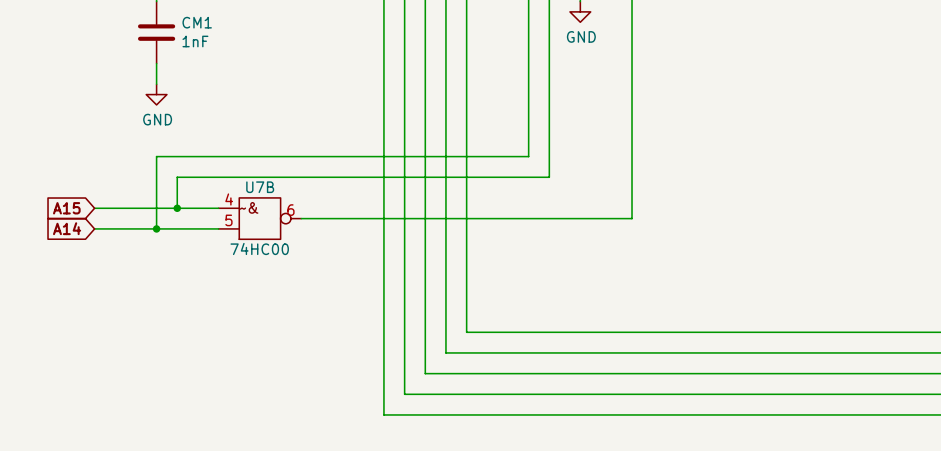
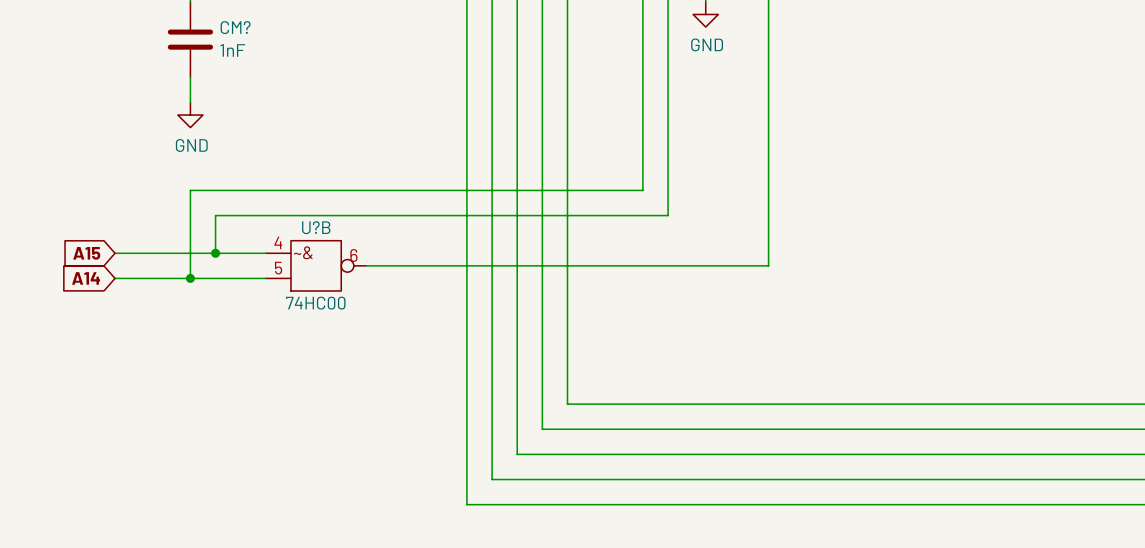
CM1 name: CM1 (197, 22) -> CM? (235, 27)
U7B name: U7B (260, 187) -> U?B (316, 227)

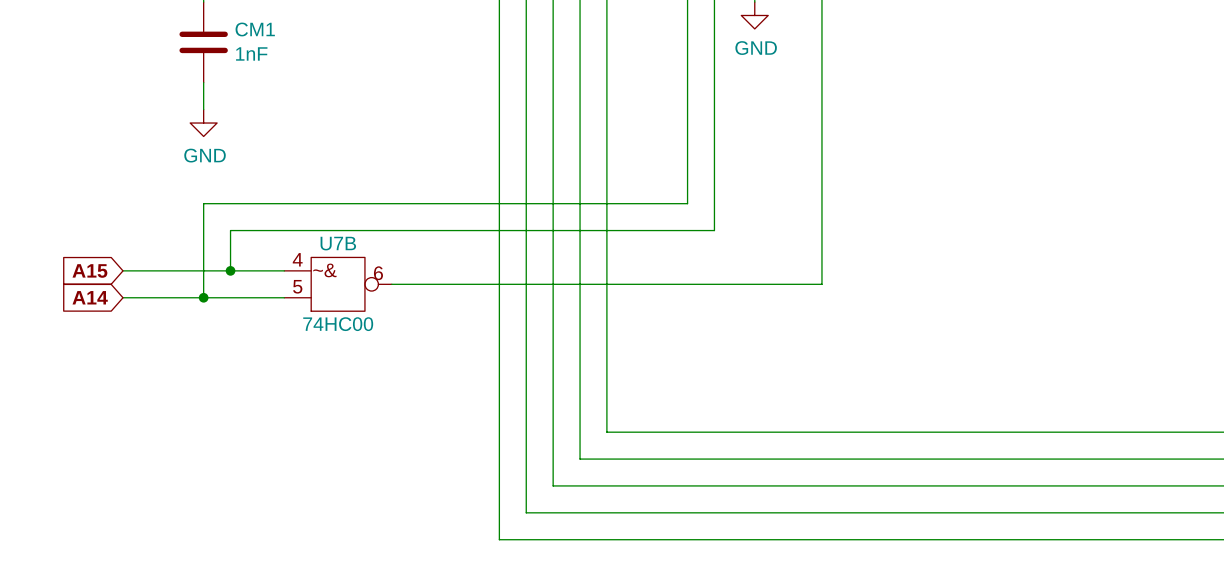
CM? name: CM? (235, 27) -> CM1 (255, 29)
U?B name: U?B (316, 227) -> U7B (338, 243)

